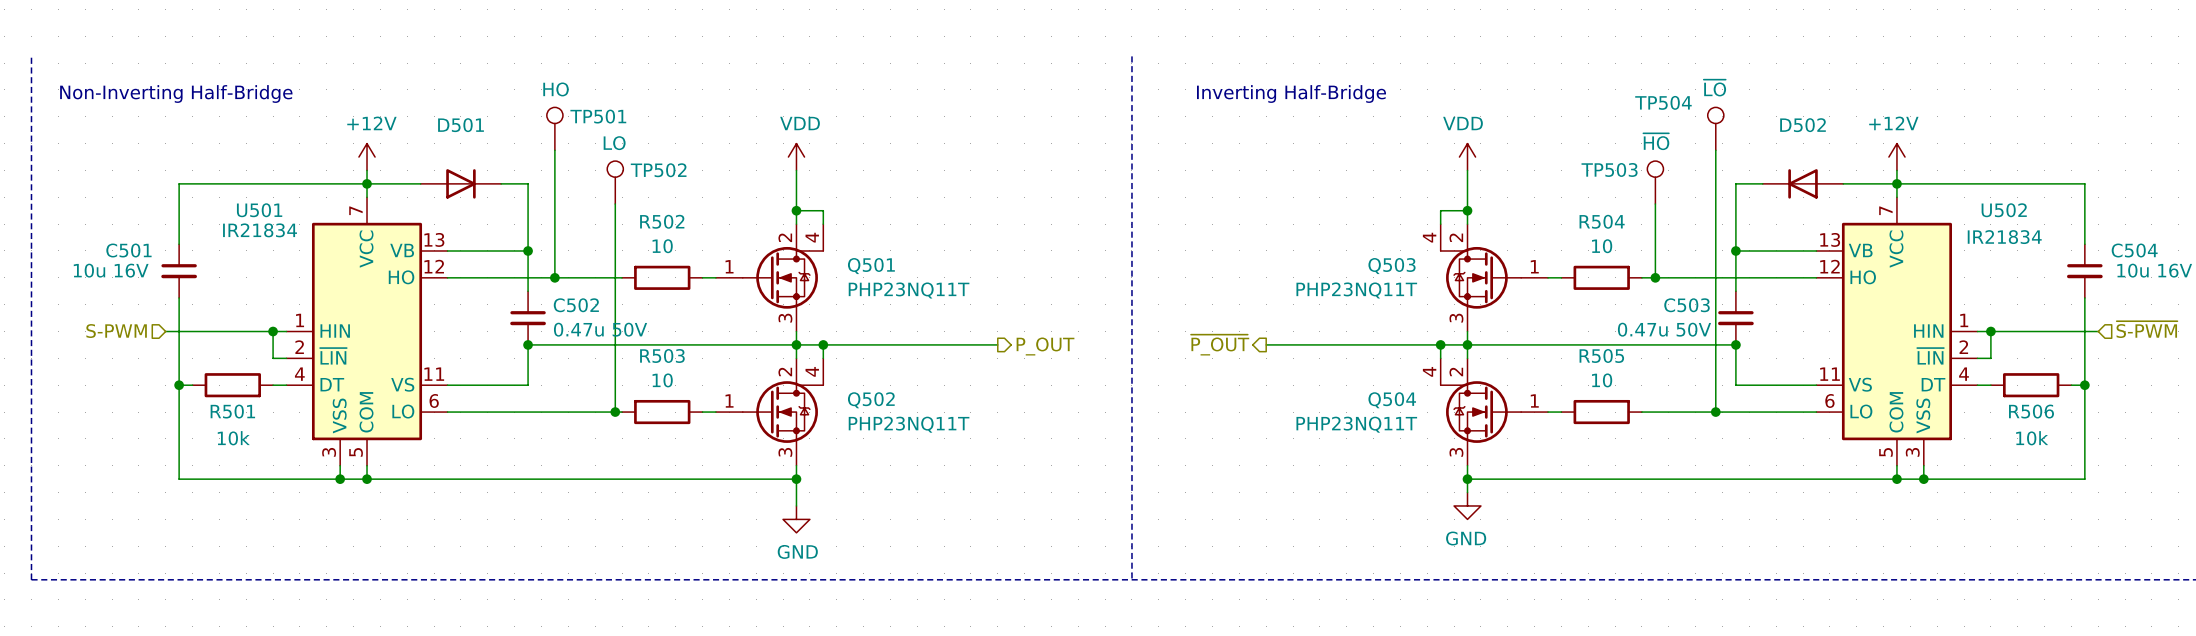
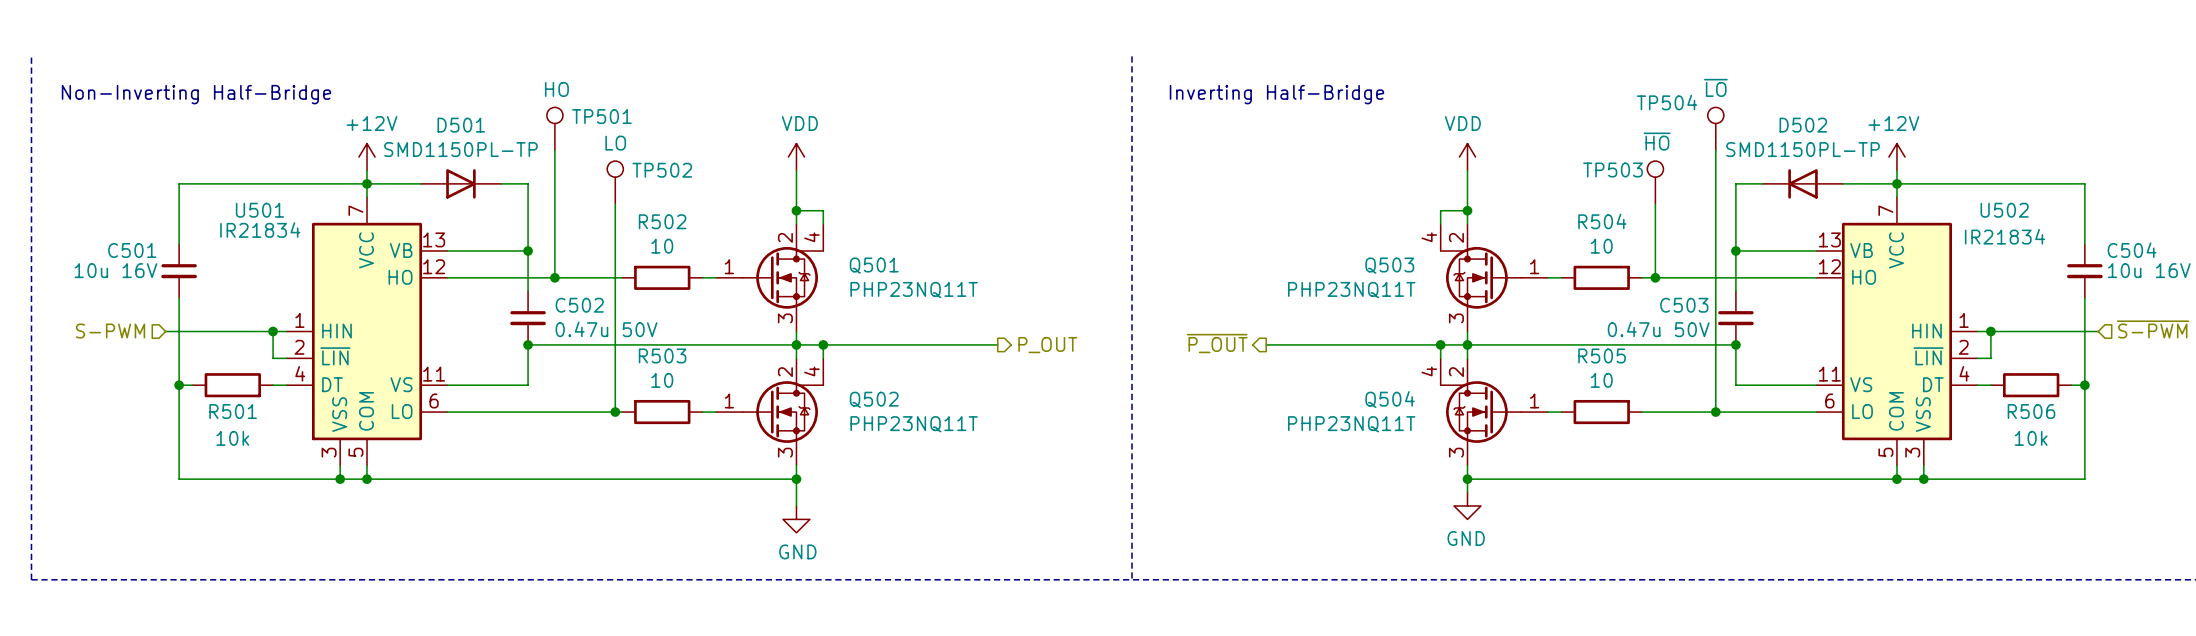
D501 value: none -> SMD1150PL-TP (460, 149)
D502 value: none -> SMD1150PL-TP (1803, 149)

